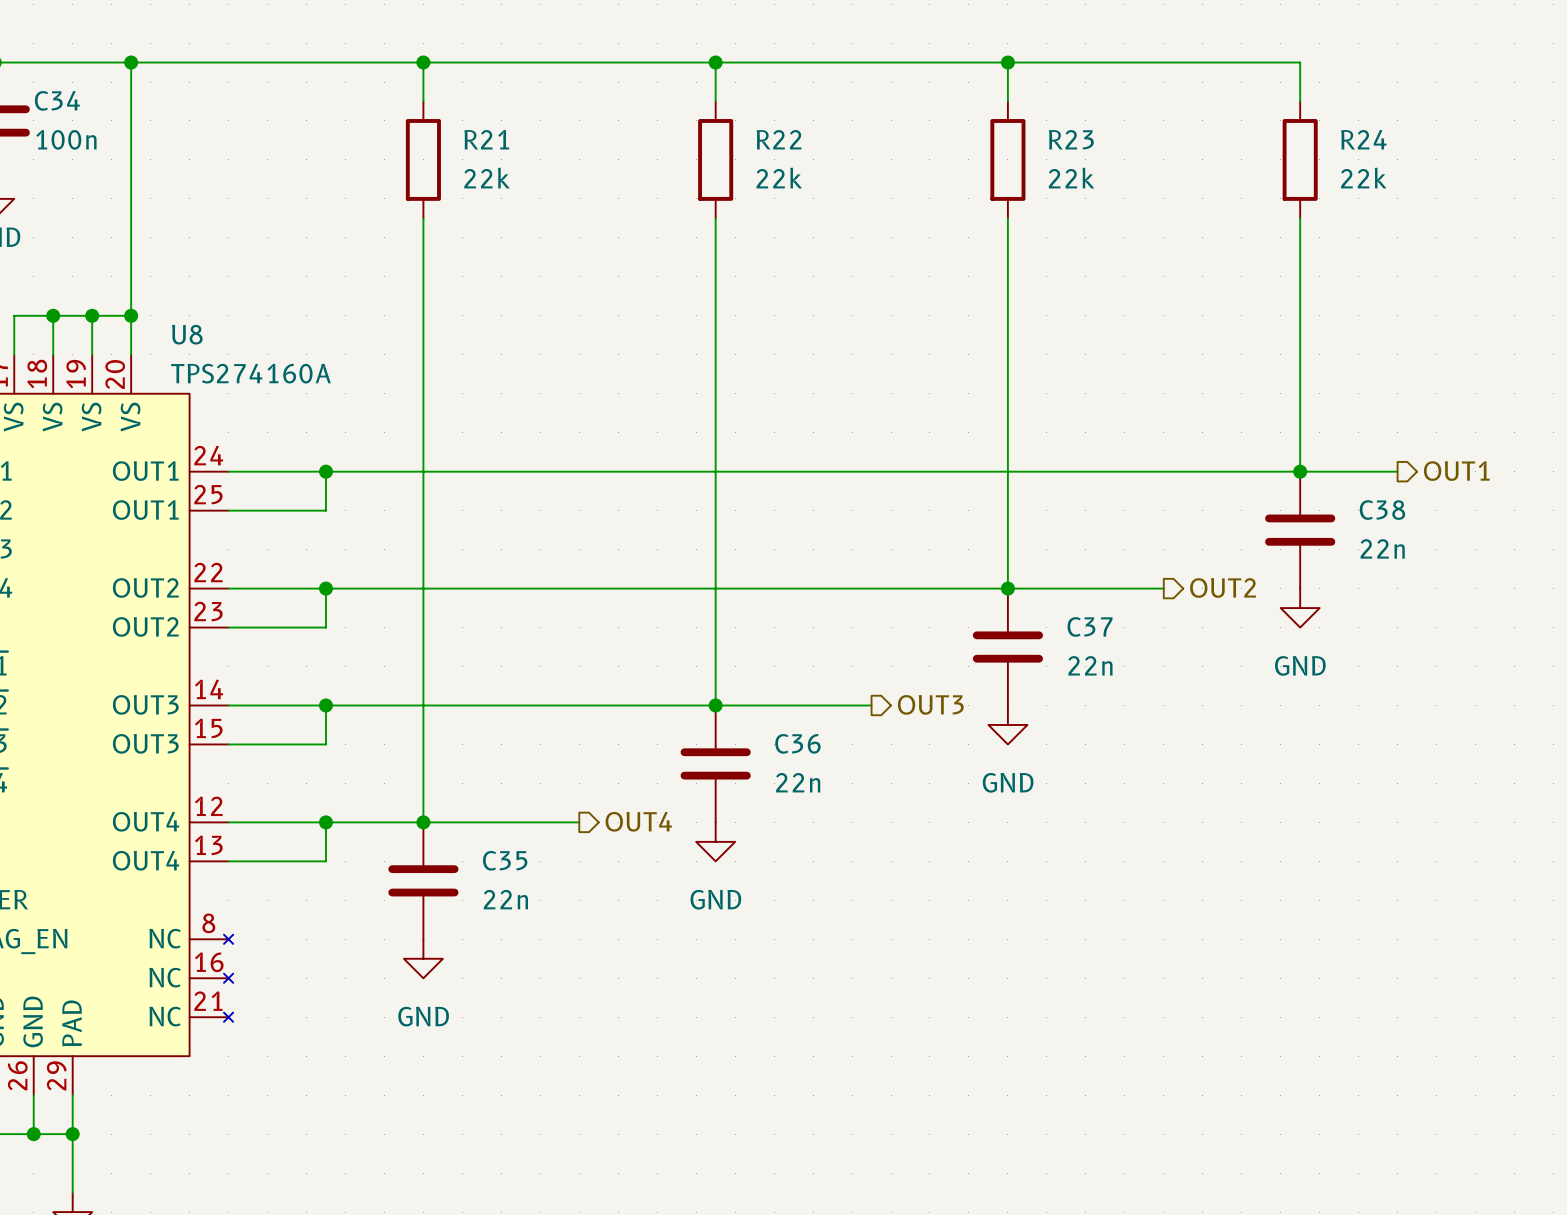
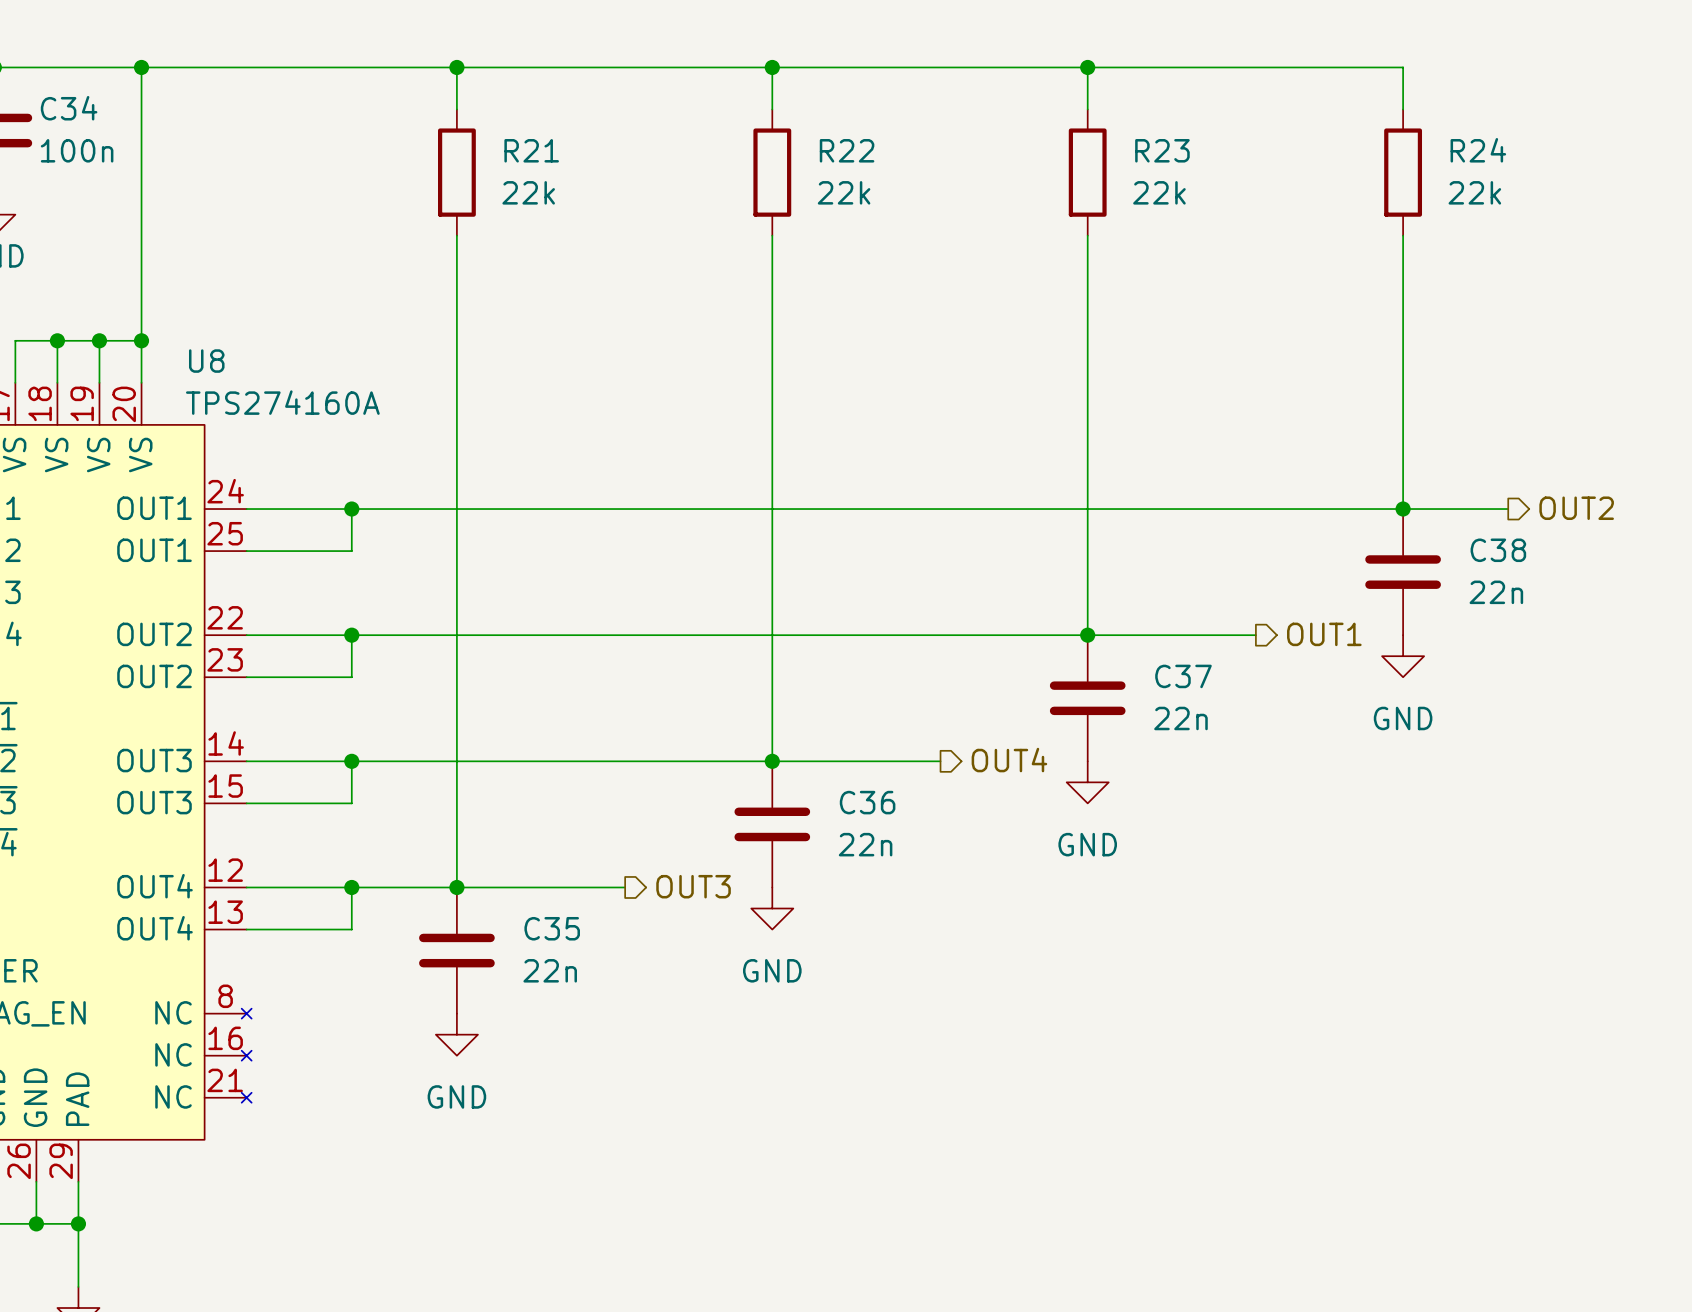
hierarchical label: OUT1 (1456, 471) -> OUT2 (1576, 508)
hierarchical label: OUT2 (1223, 587) -> OUT1 (1324, 634)
hierarchical label: OUT3 (930, 704) -> OUT4 (1009, 760)
hierarchical label: OUT4 (638, 821) -> OUT3 (693, 886)

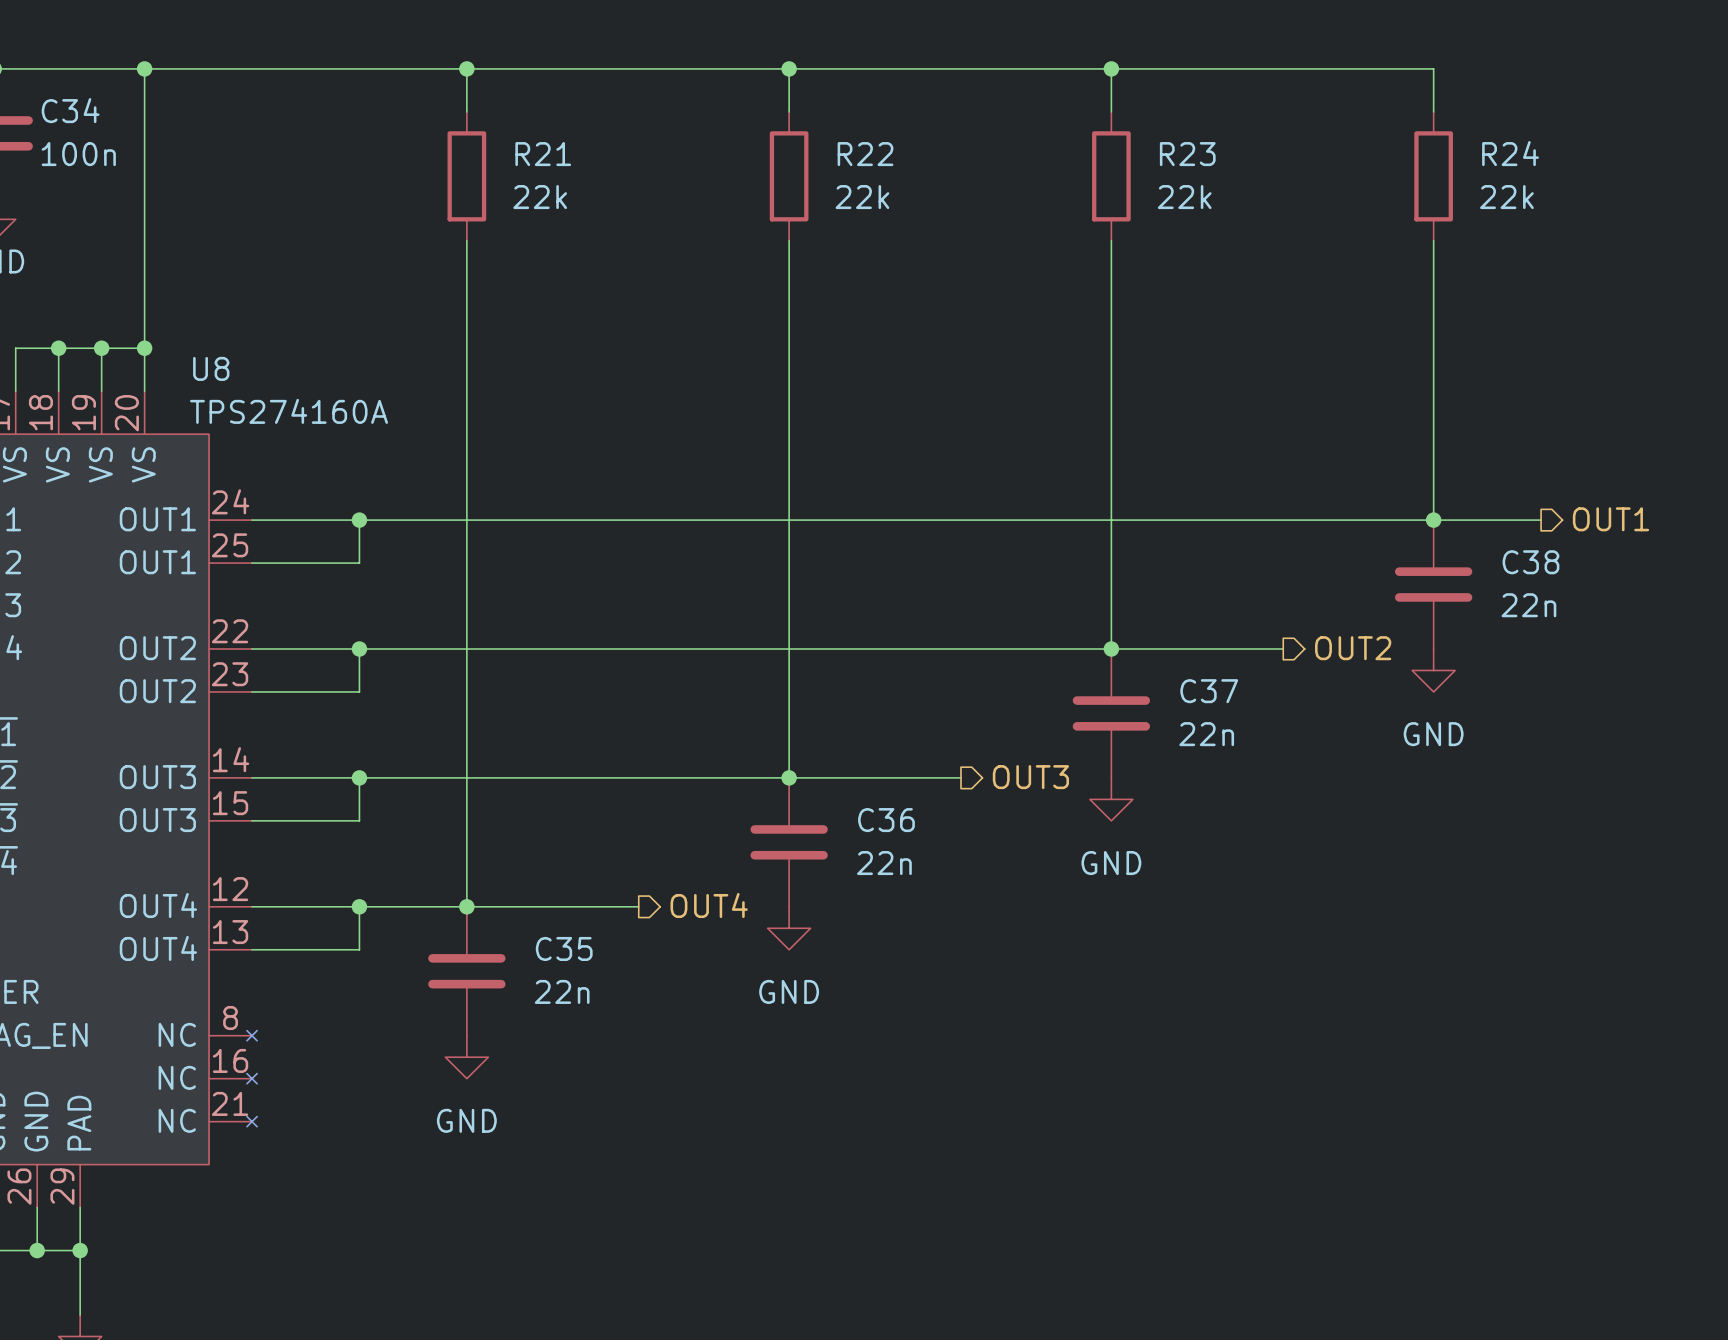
hierarchical label: OUT2 (1576, 508) -> OUT1 (1610, 519)
hierarchical label: OUT1 (1324, 634) -> OUT2 (1353, 648)
hierarchical label: OUT4 (1009, 760) -> OUT3 (1030, 777)
hierarchical label: OUT3 (693, 886) -> OUT4 (709, 905)

